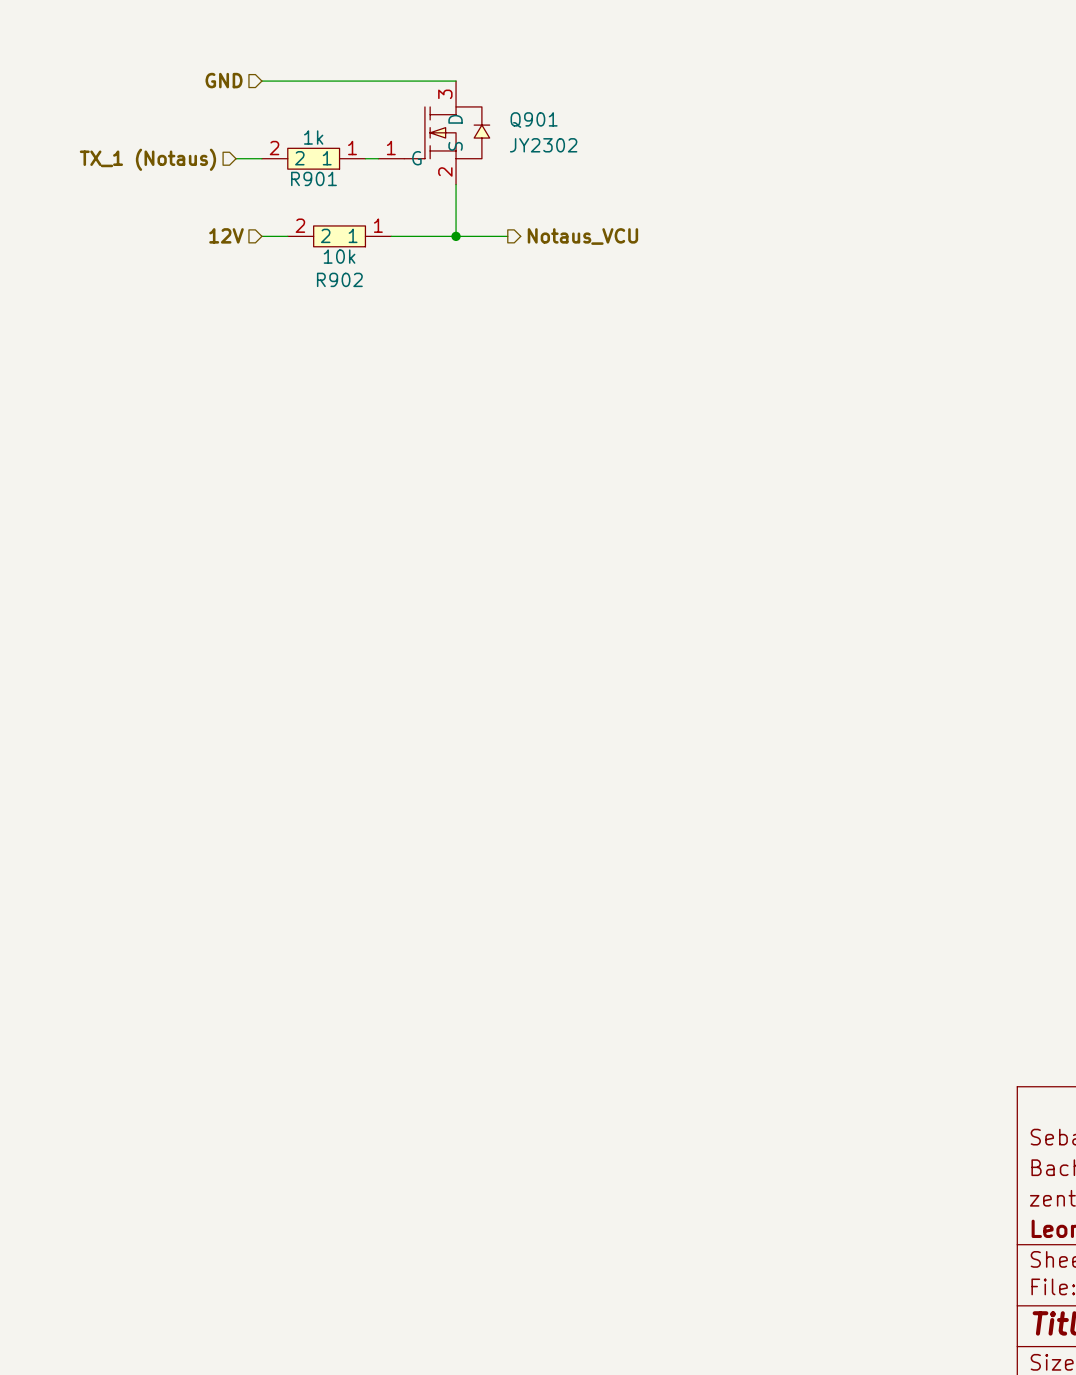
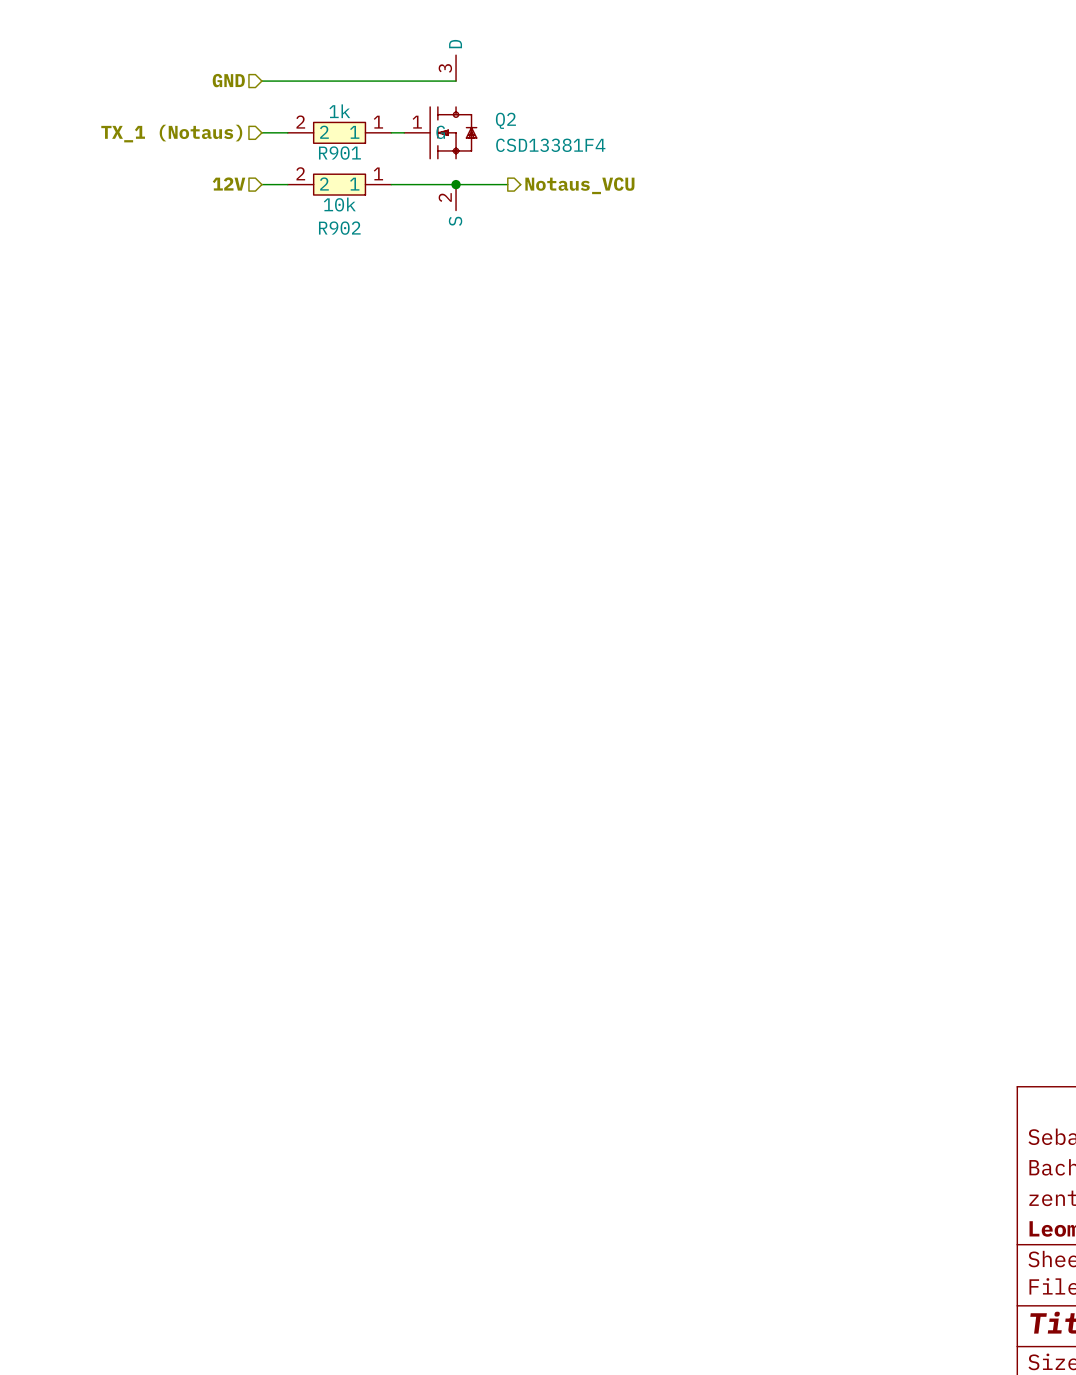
Q901: JY2302 (434, 132) -> none
Q2: none -> CSD13381F4 (440, 132)
wire: (236, 158) (261, 158) -> (261, 132) (287, 132)
R901 position: (313, 158) -> (339, 132)
wire: (365, 158) (378, 158) -> (391, 132) (404, 132)
hierarchical label position: TX_1 (Notaus) (147, 159) -> TX_1 (Notaus) (171, 133)
hierarchical label position: 12V (226, 235) -> 12V (229, 184)
wire: (261, 236) (287, 236) -> (261, 184) (287, 184)
R902 position: (339, 236) -> (339, 184)
wire: (391, 236) (507, 236) -> (391, 184) (507, 184)
junction position: (456, 236) -> (456, 184)
hierarchical label position: Notaus_VCU (582, 236) -> Notaus_VCU (579, 185)

